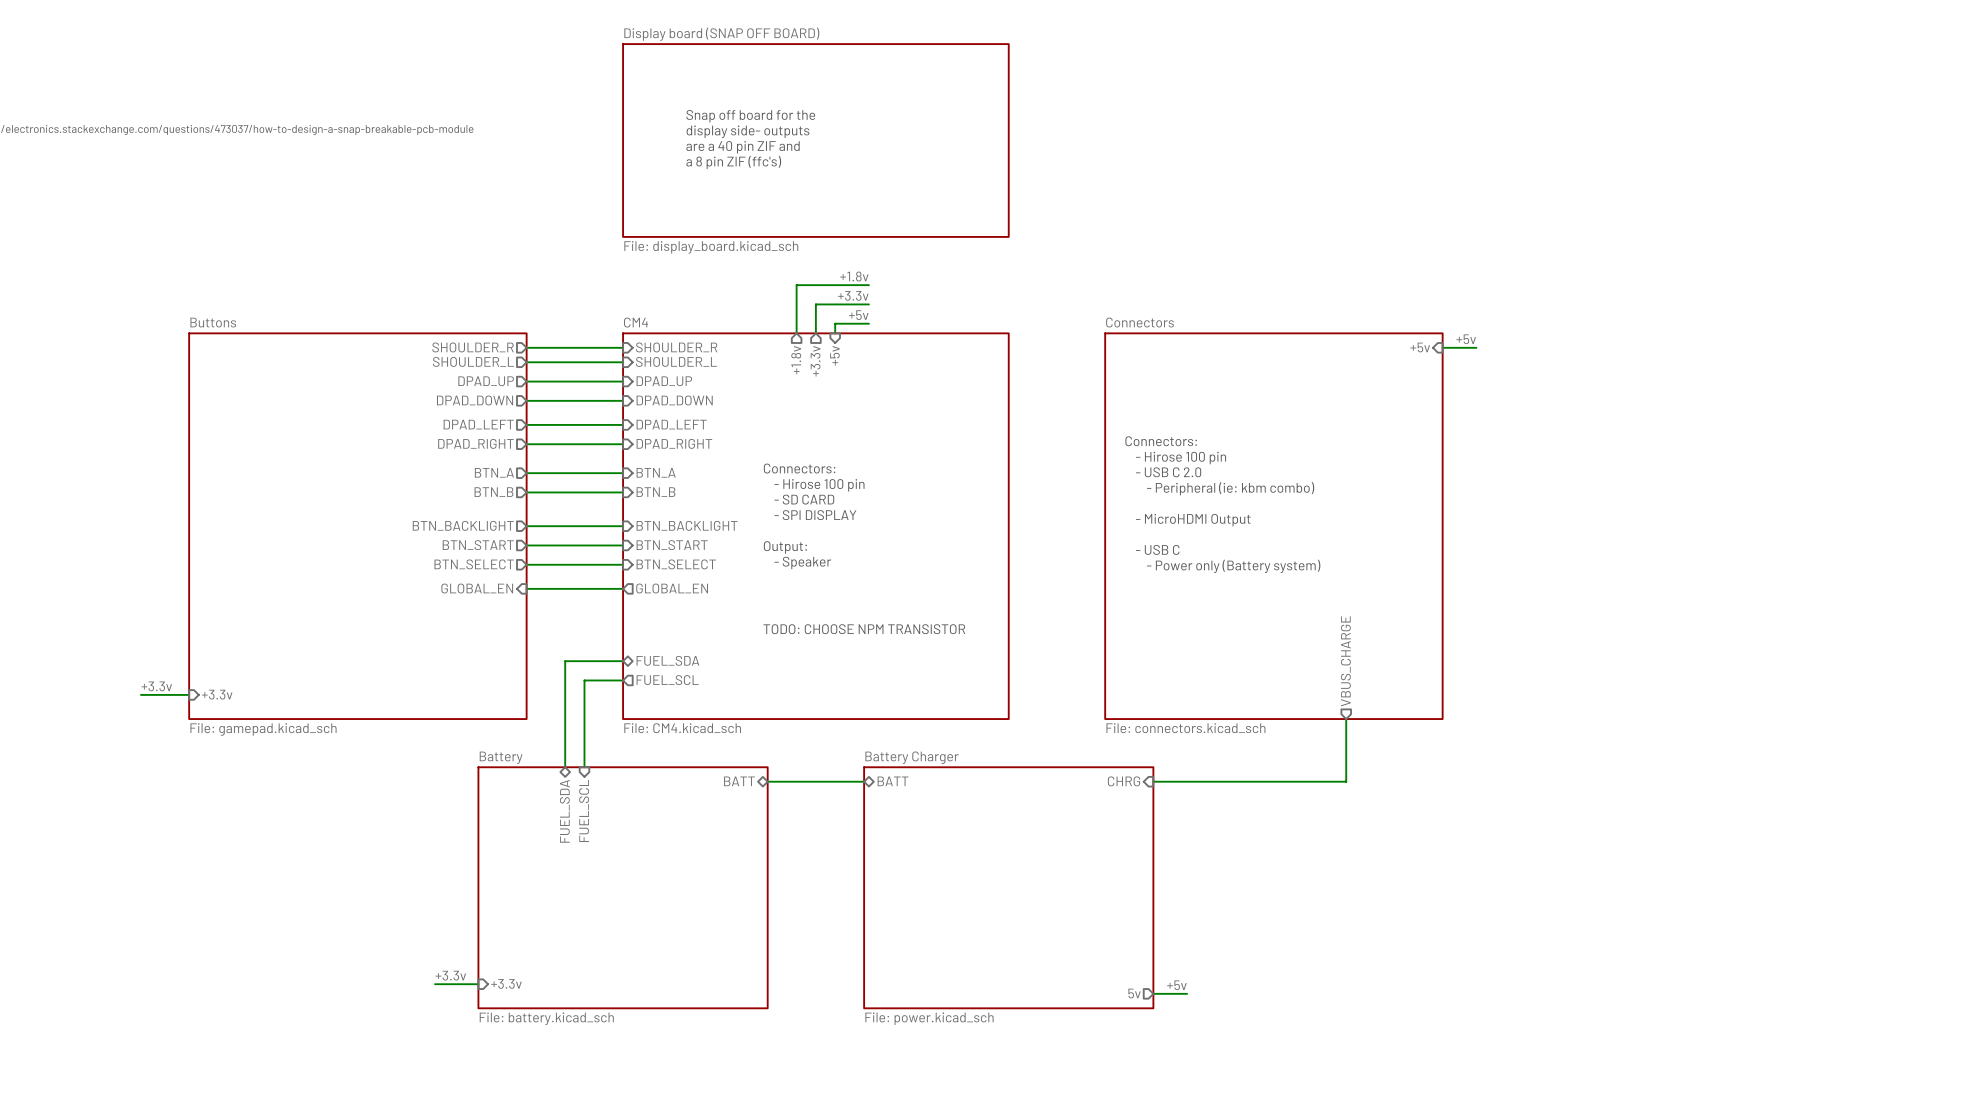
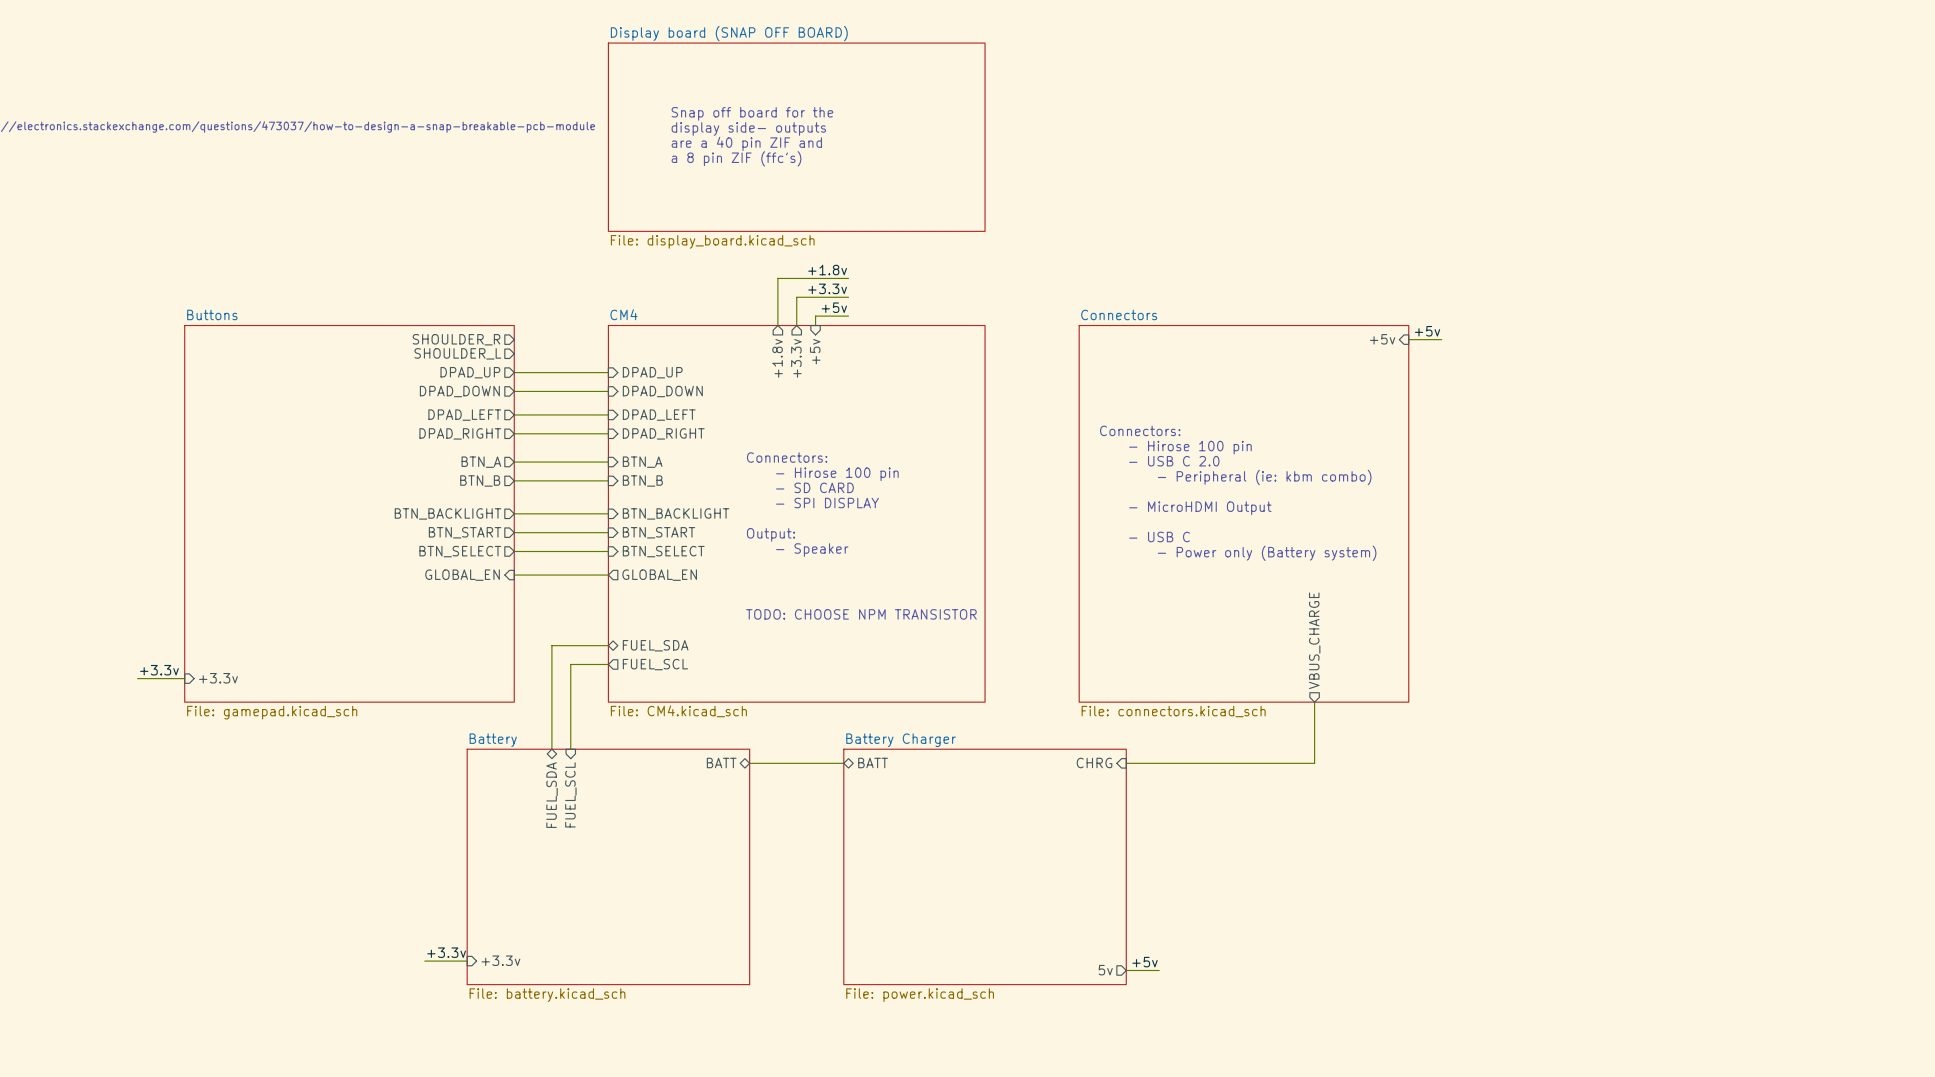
wire: (526, 347) (623, 347) -> none
sheet pin: SHOULDER_R (676, 347) -> none
sheet pin: SHOULDER_L (676, 361) -> none
wire: (526, 362) (623, 362) -> none

